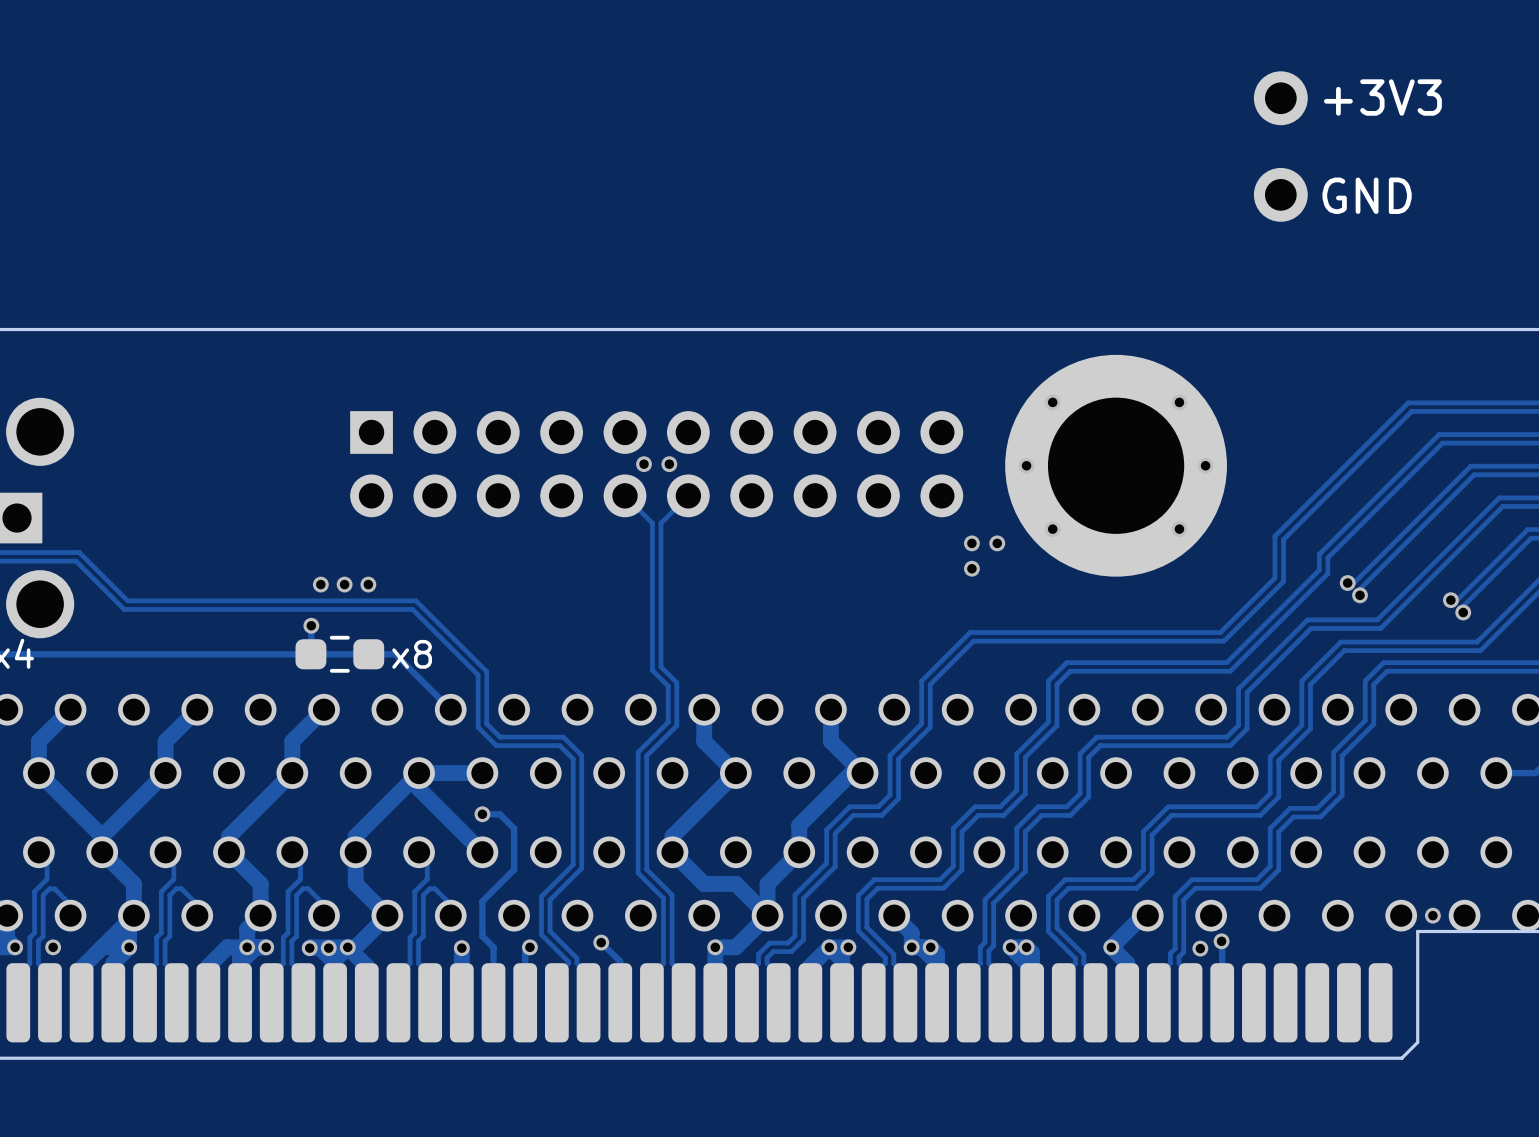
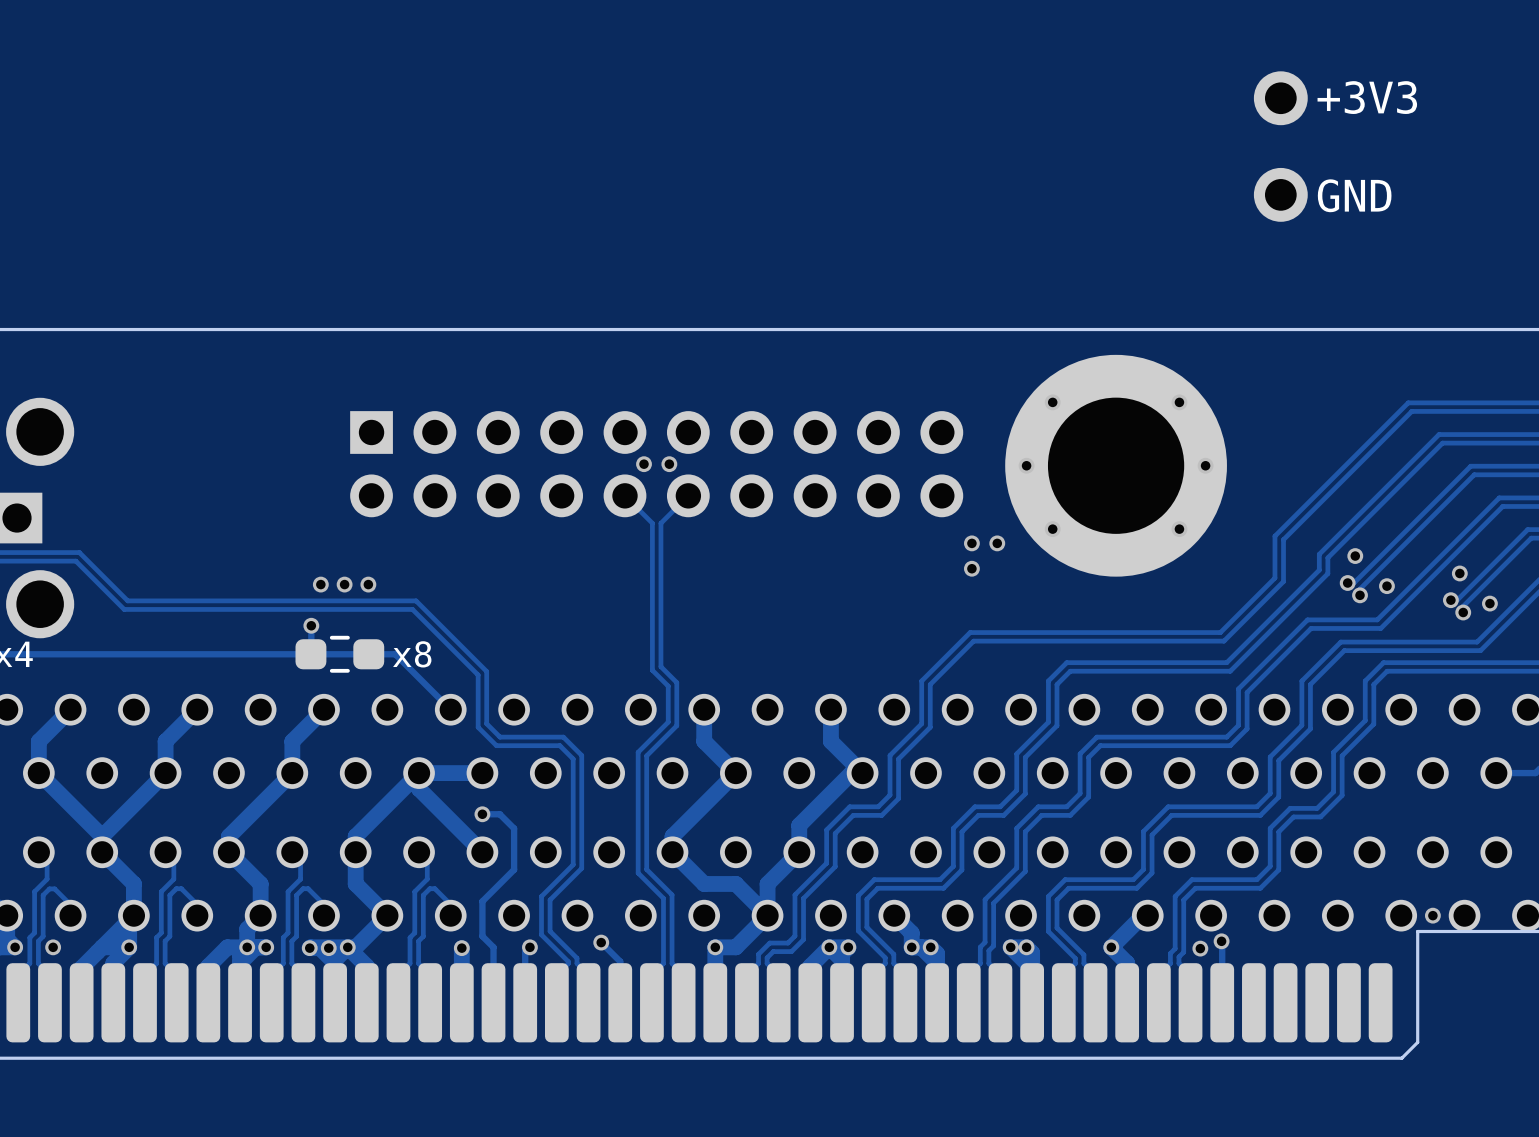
via: none -> (1355, 556)
via: none -> (1459, 573)
via: none -> (1386, 586)
via: none -> (1489, 603)

